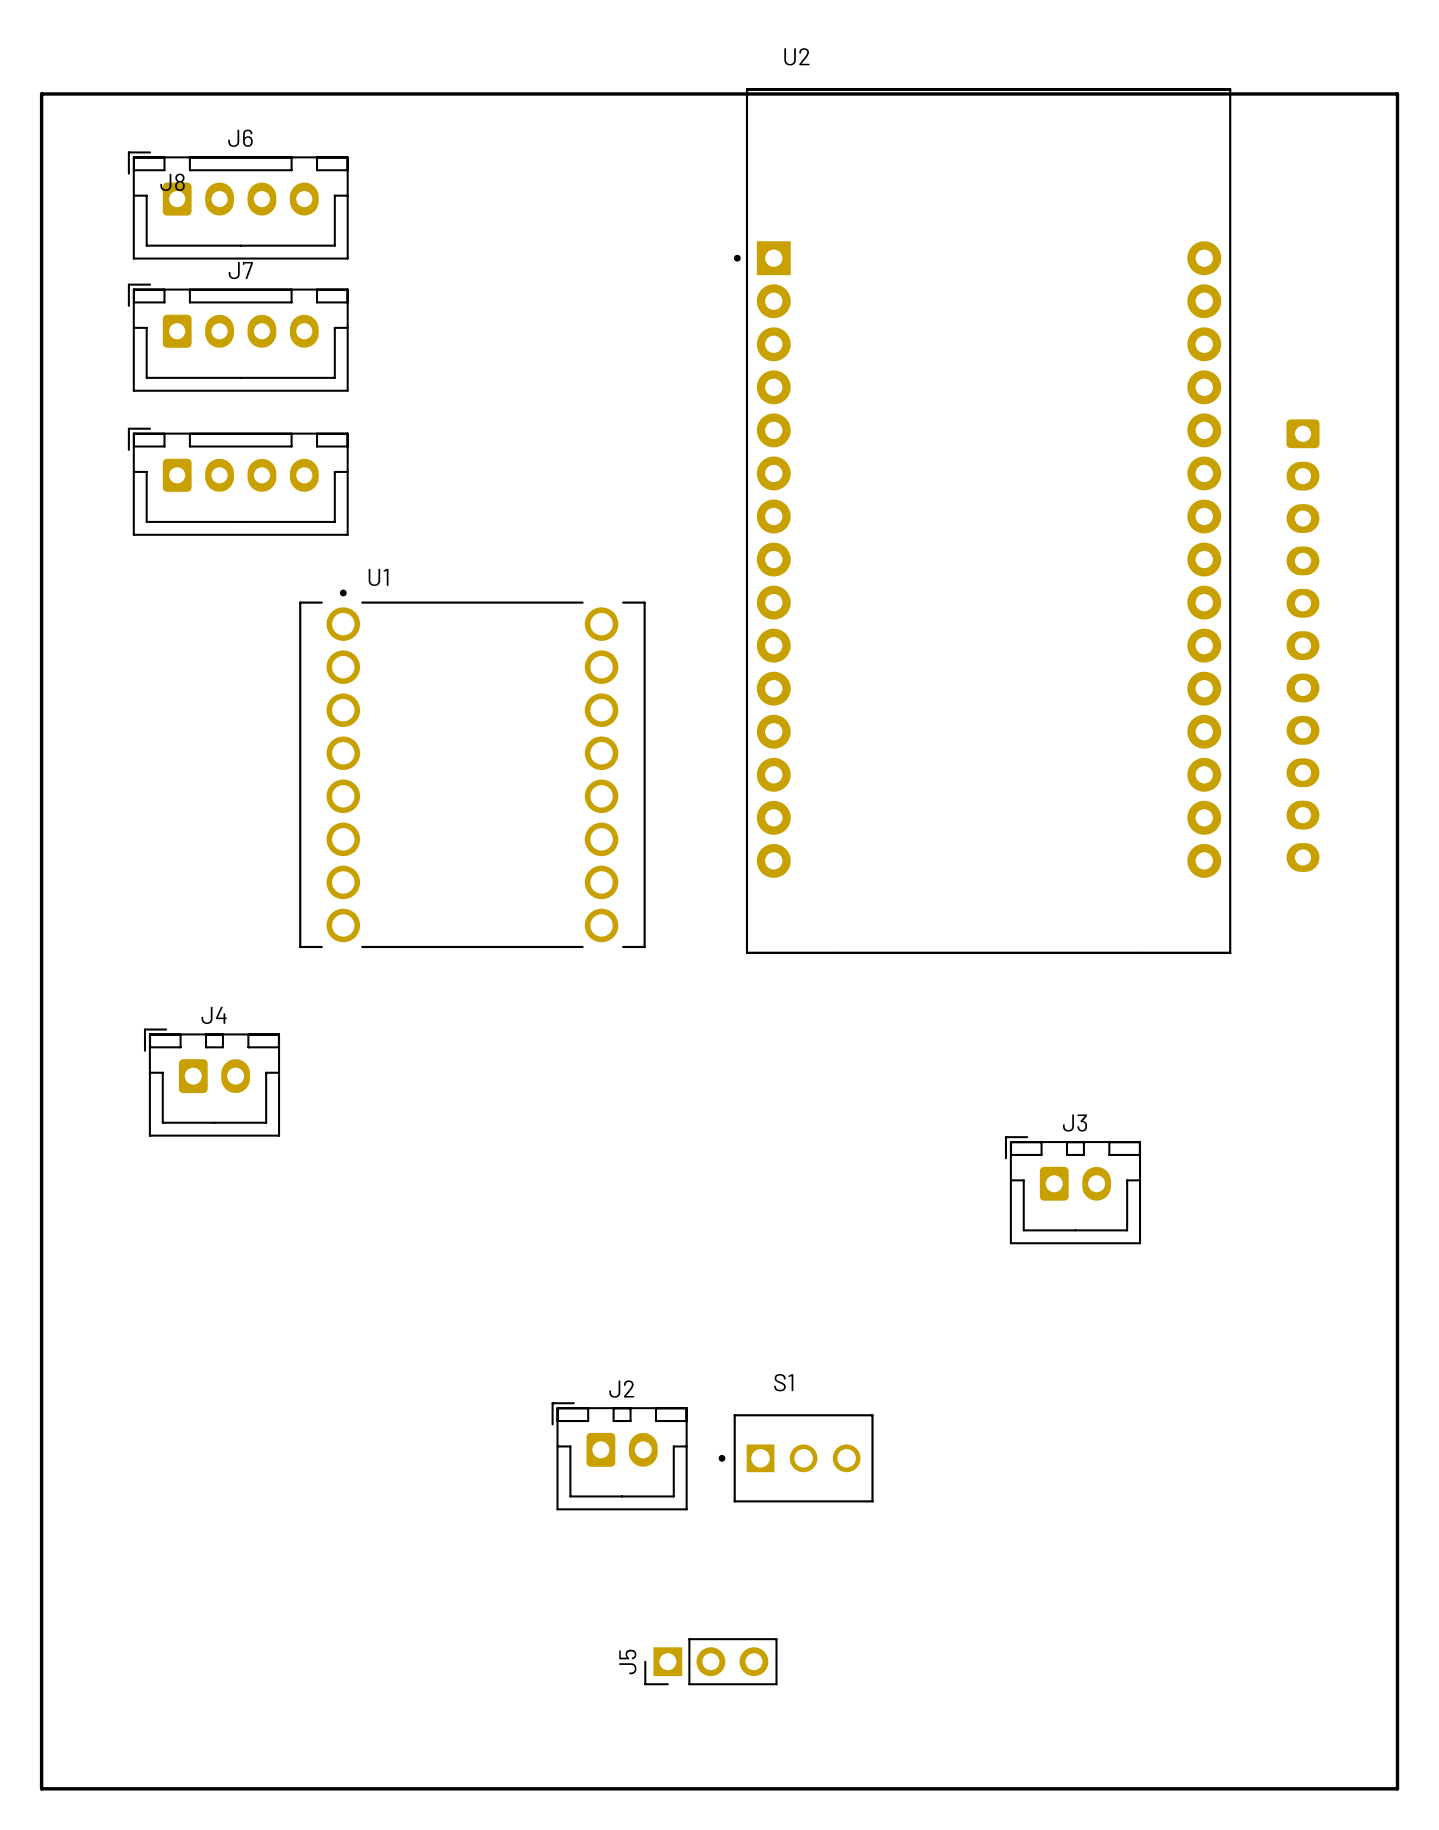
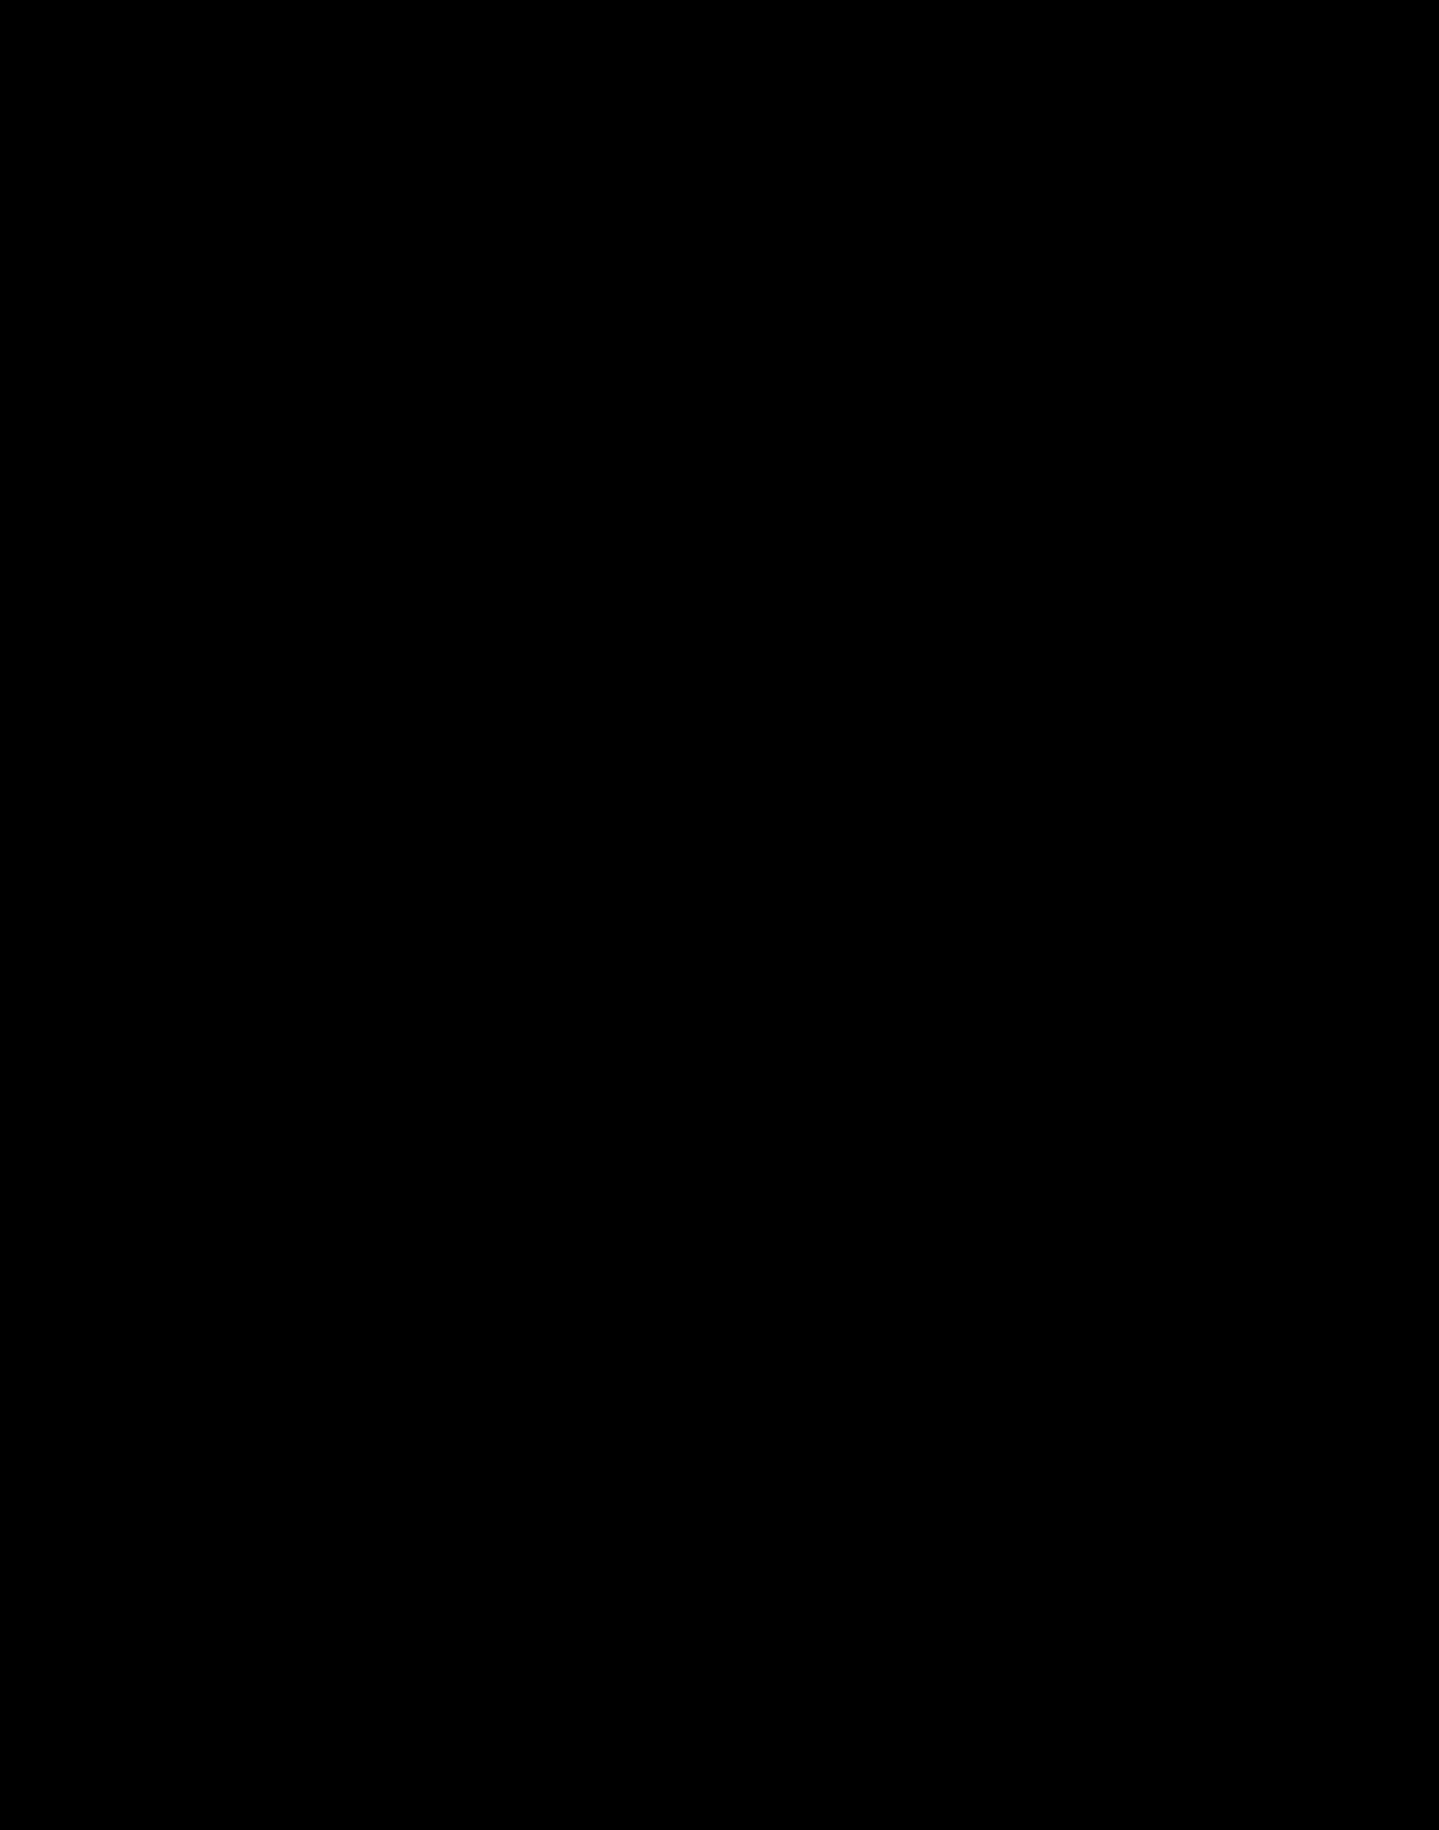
board edge: (41, 93) (1397, 93) (1397, 1788) (41, 1788) (41, 93) -> none
J6: (238, 205) -> none
J7: (238, 337) -> none
J8: (238, 481) -> none
U2: (982, 521) -> none
part: (1302, 645) -> none
U1: (472, 768) -> none
J4: (212, 1082) -> none
J3: (1073, 1190) -> none
J2: (619, 1456) -> none
S1: (796, 1458) -> none
J5: (710, 1661) -> none

